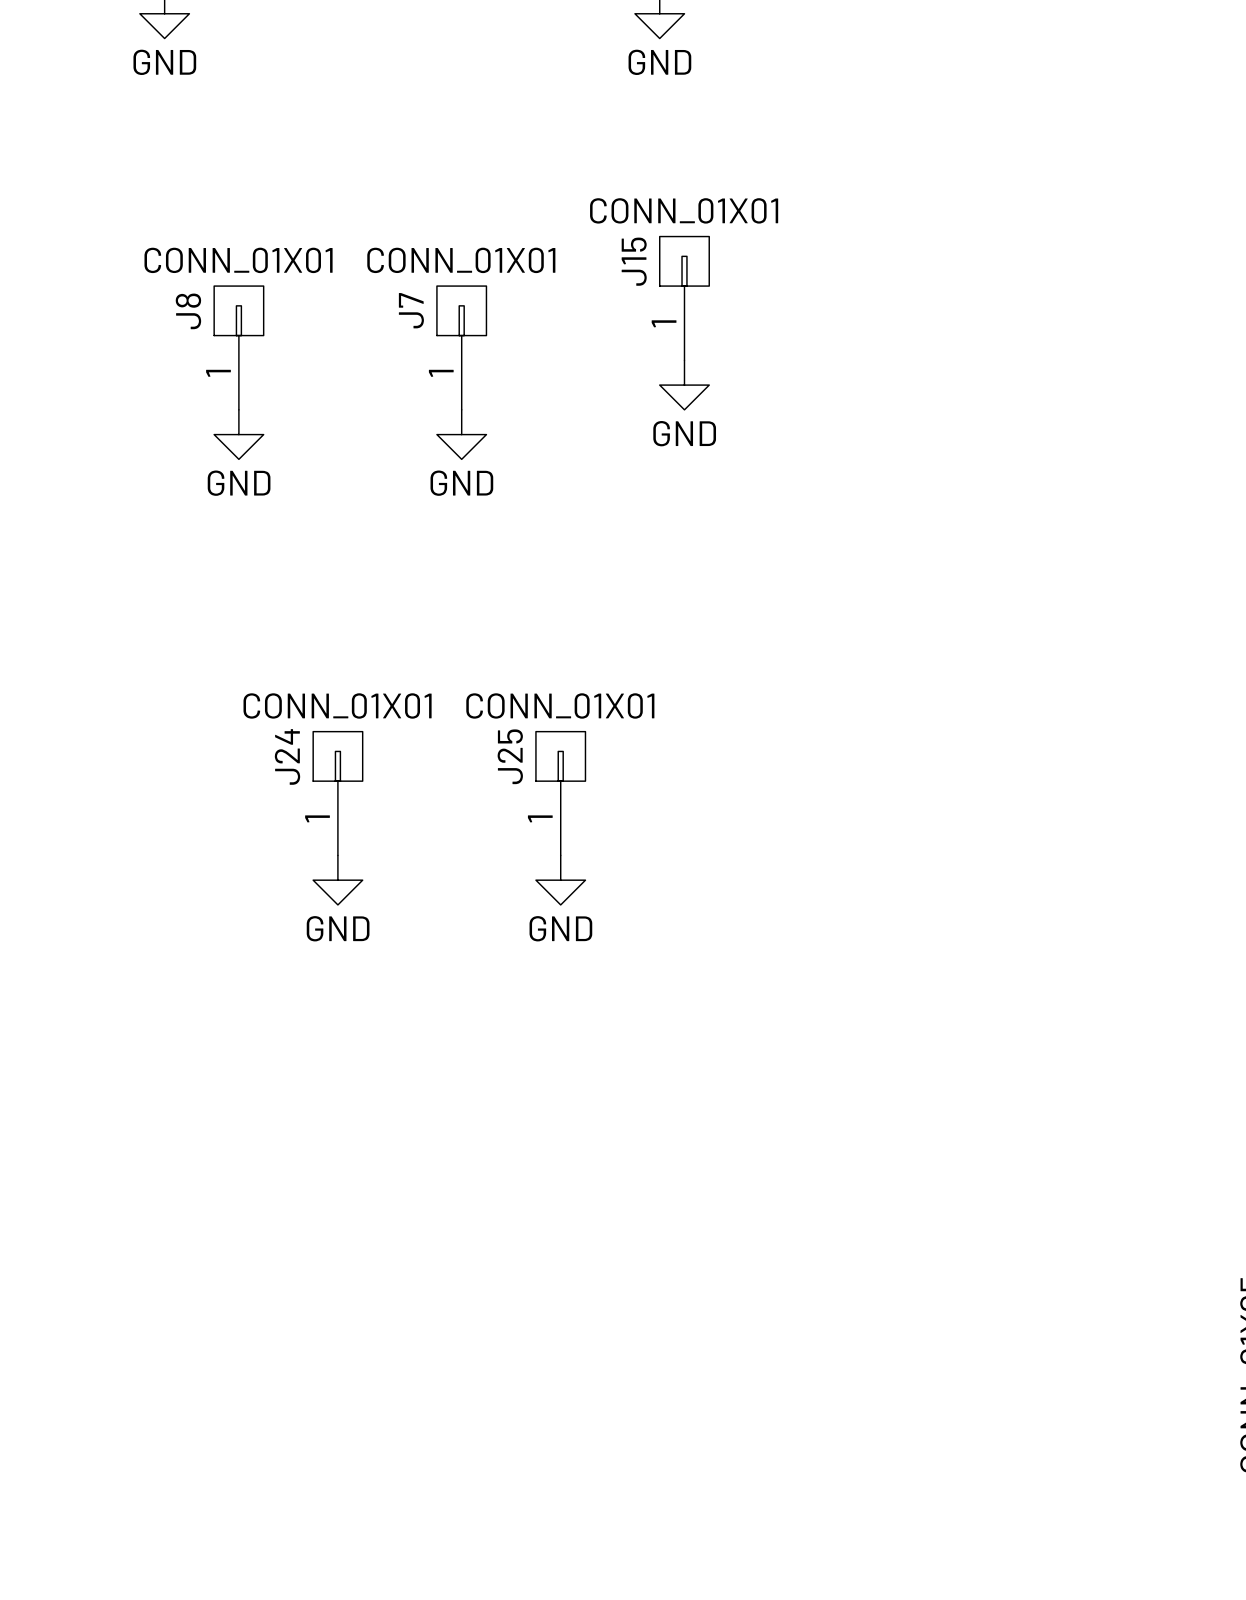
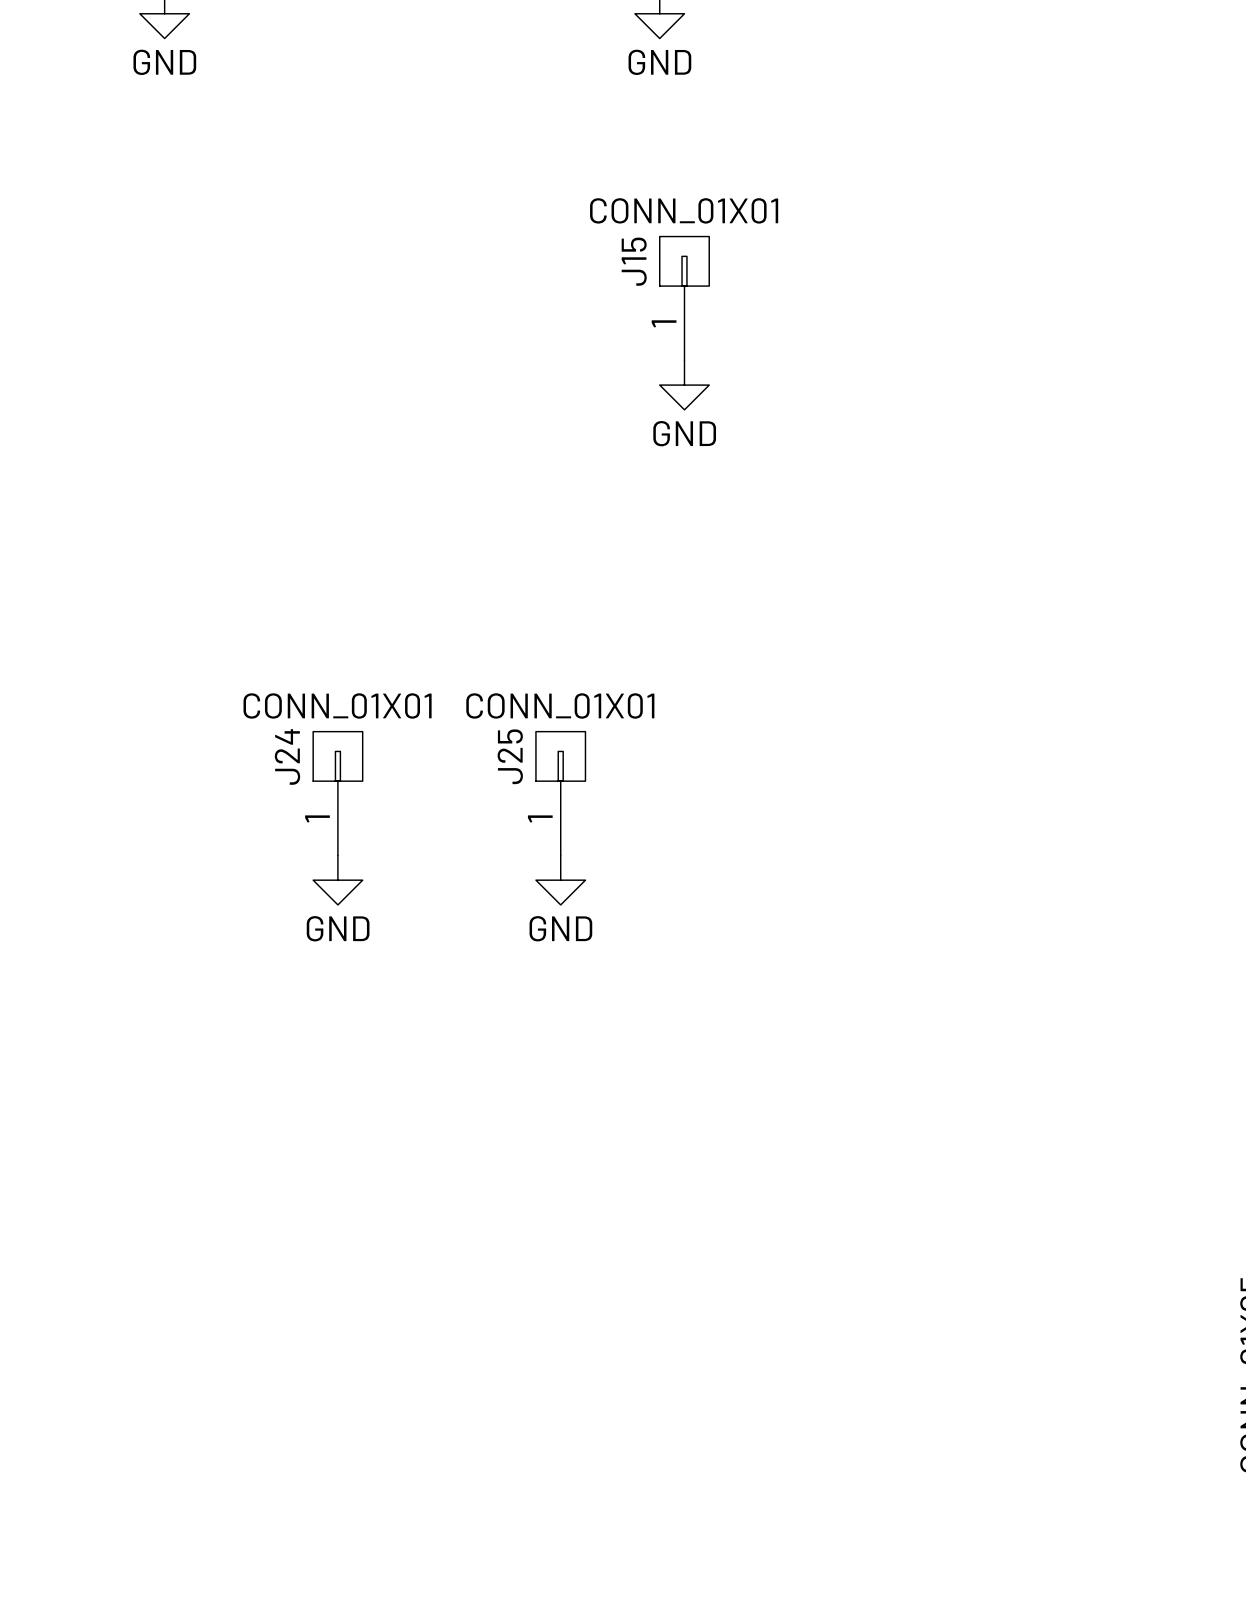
J8: CONN_01X01 (238, 347) -> none
J7: CONN_01X01 (461, 347) -> none
power symbol: GND (238, 434) -> none
power symbol: GND (461, 434) -> none

